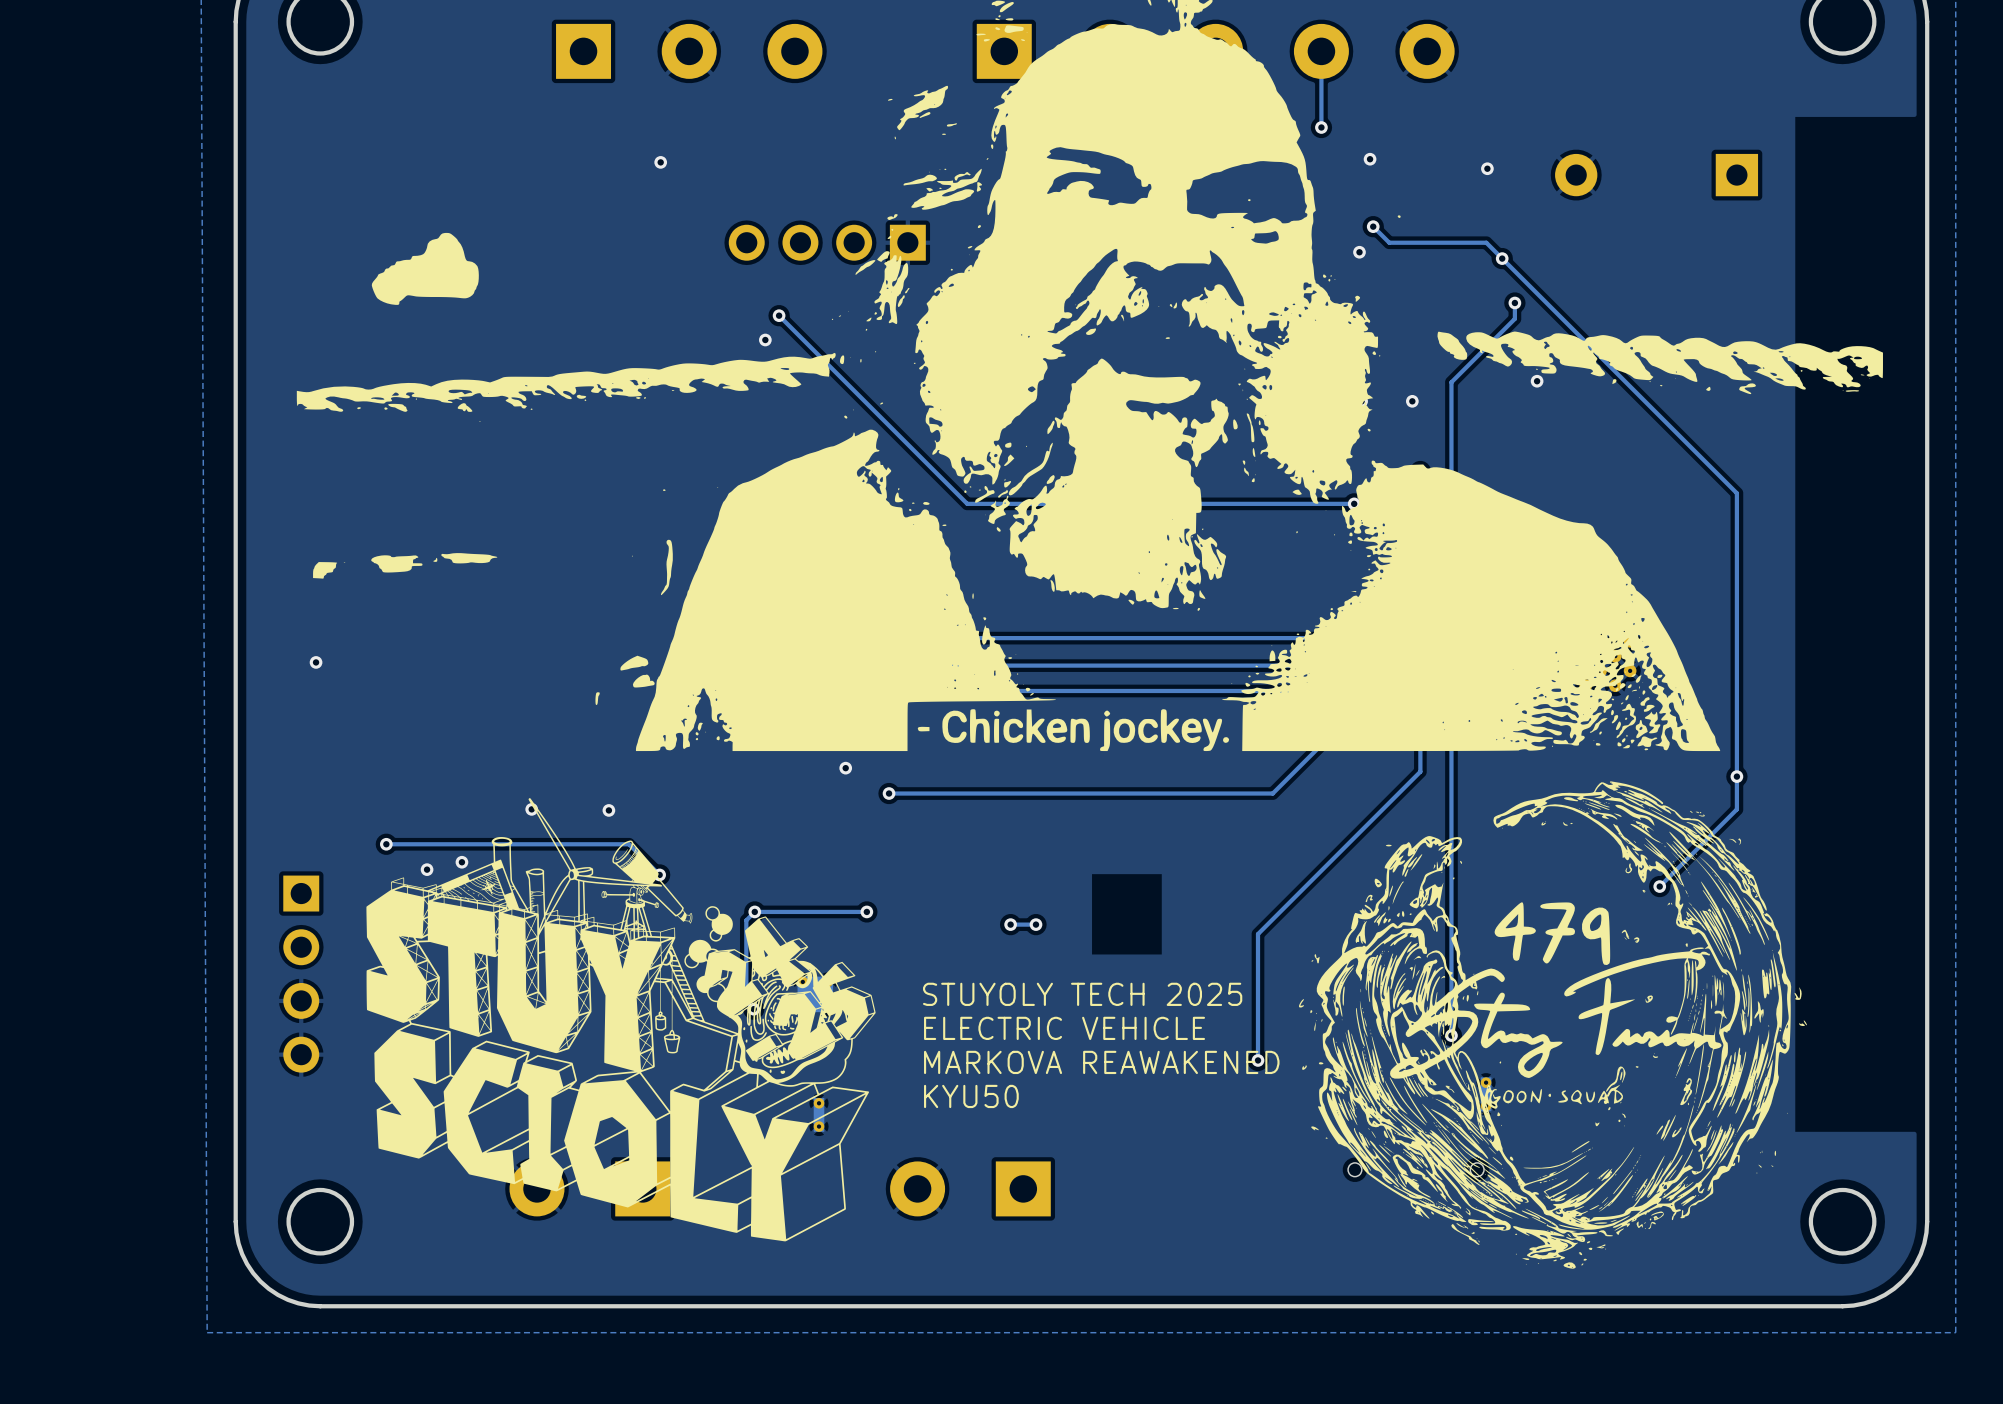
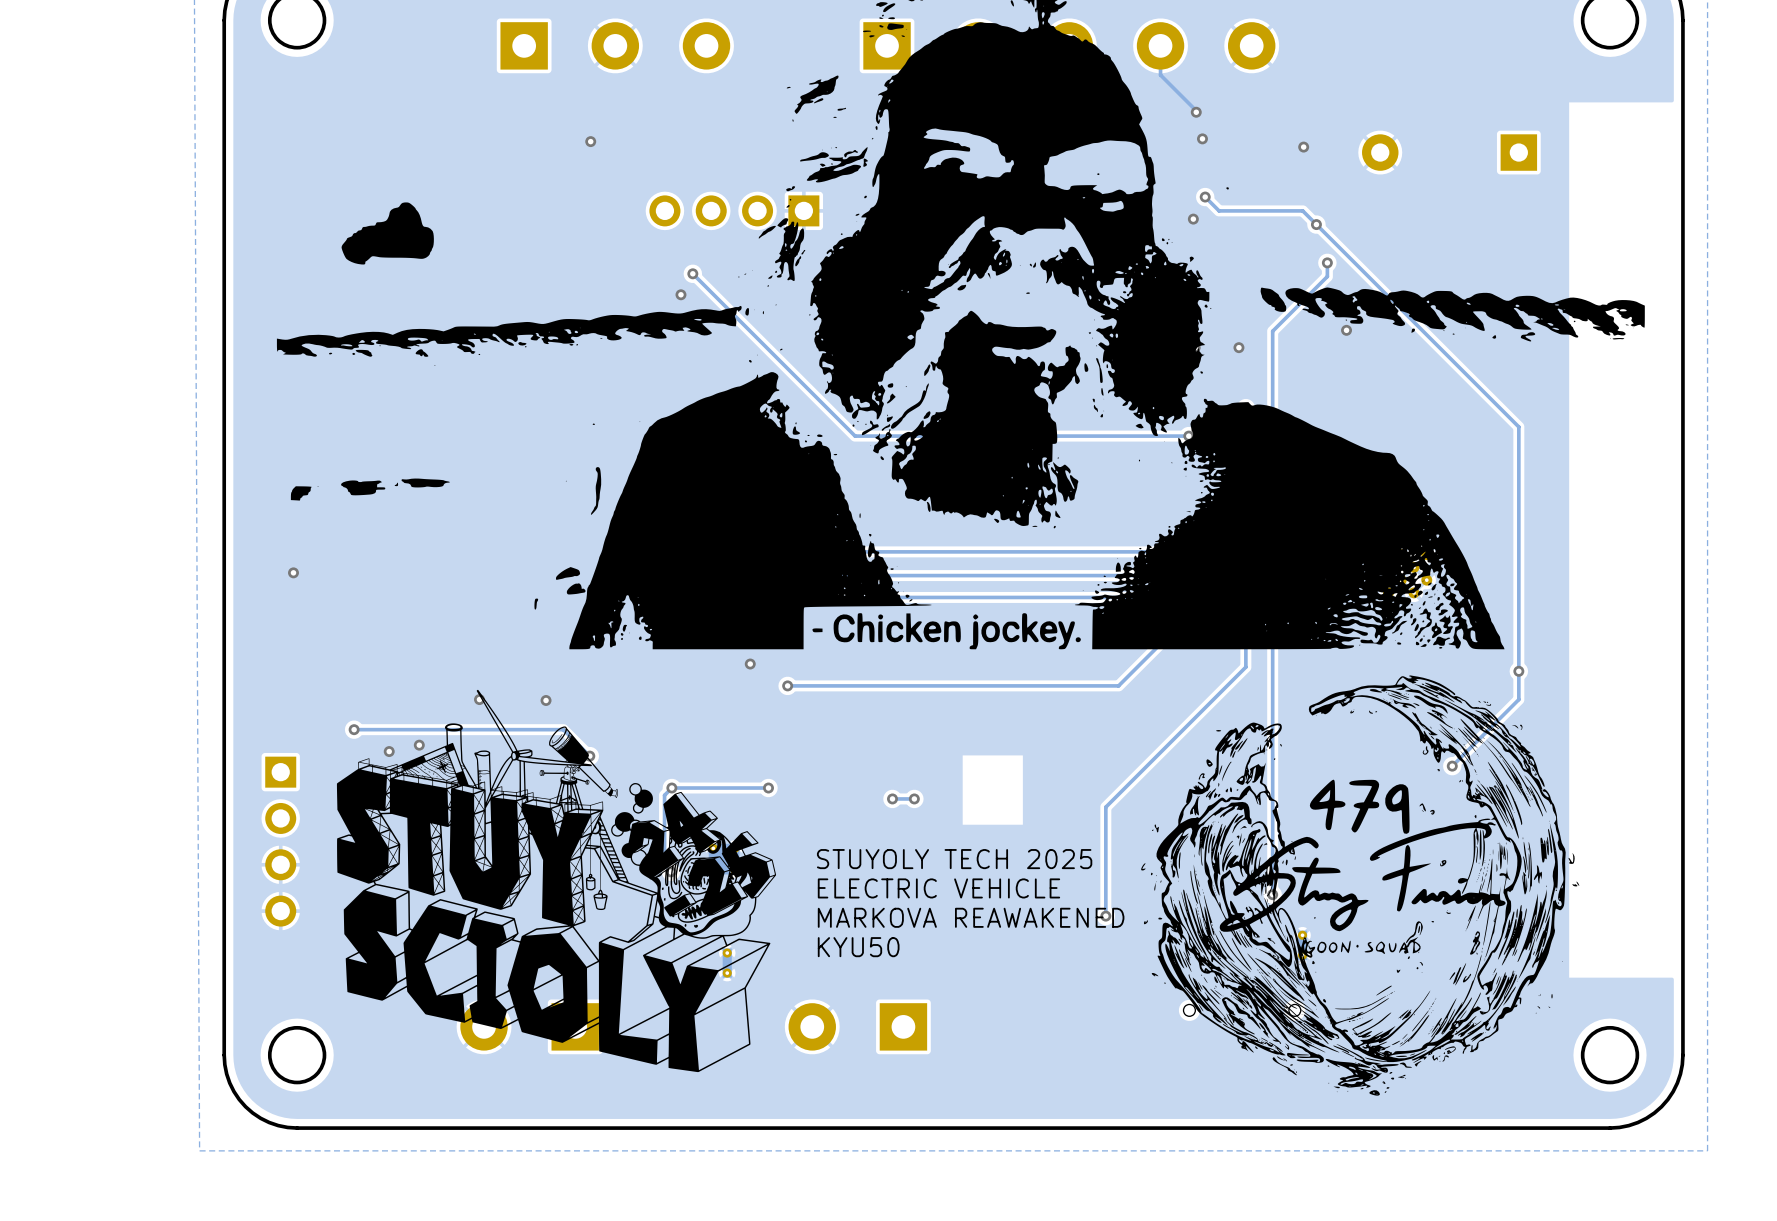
track: (1321, 85) (1321, 127) -> (1160, 75) (1196, 112)
via position: (1321, 127) -> (1196, 112)

